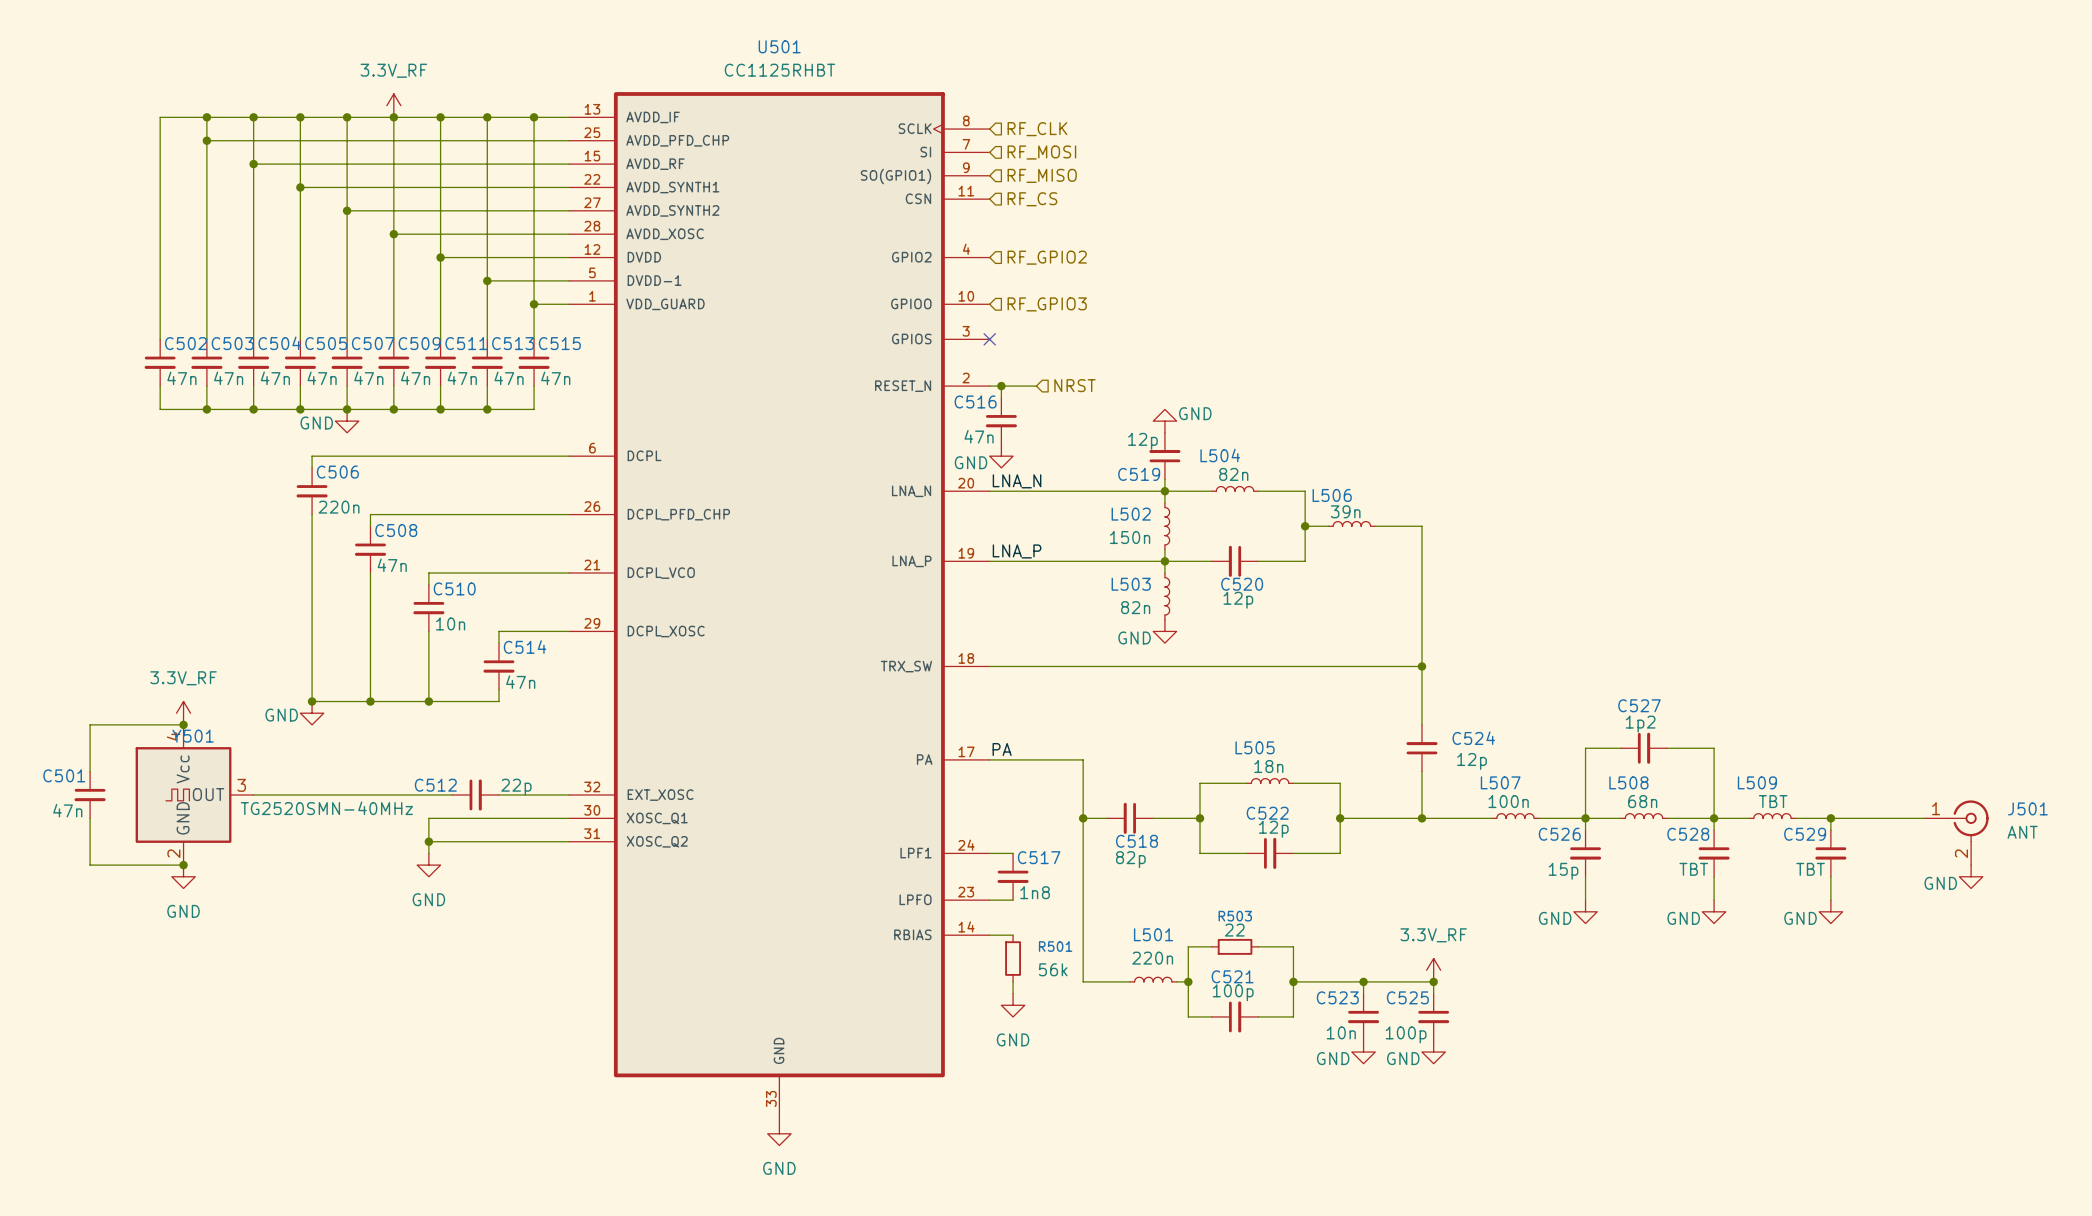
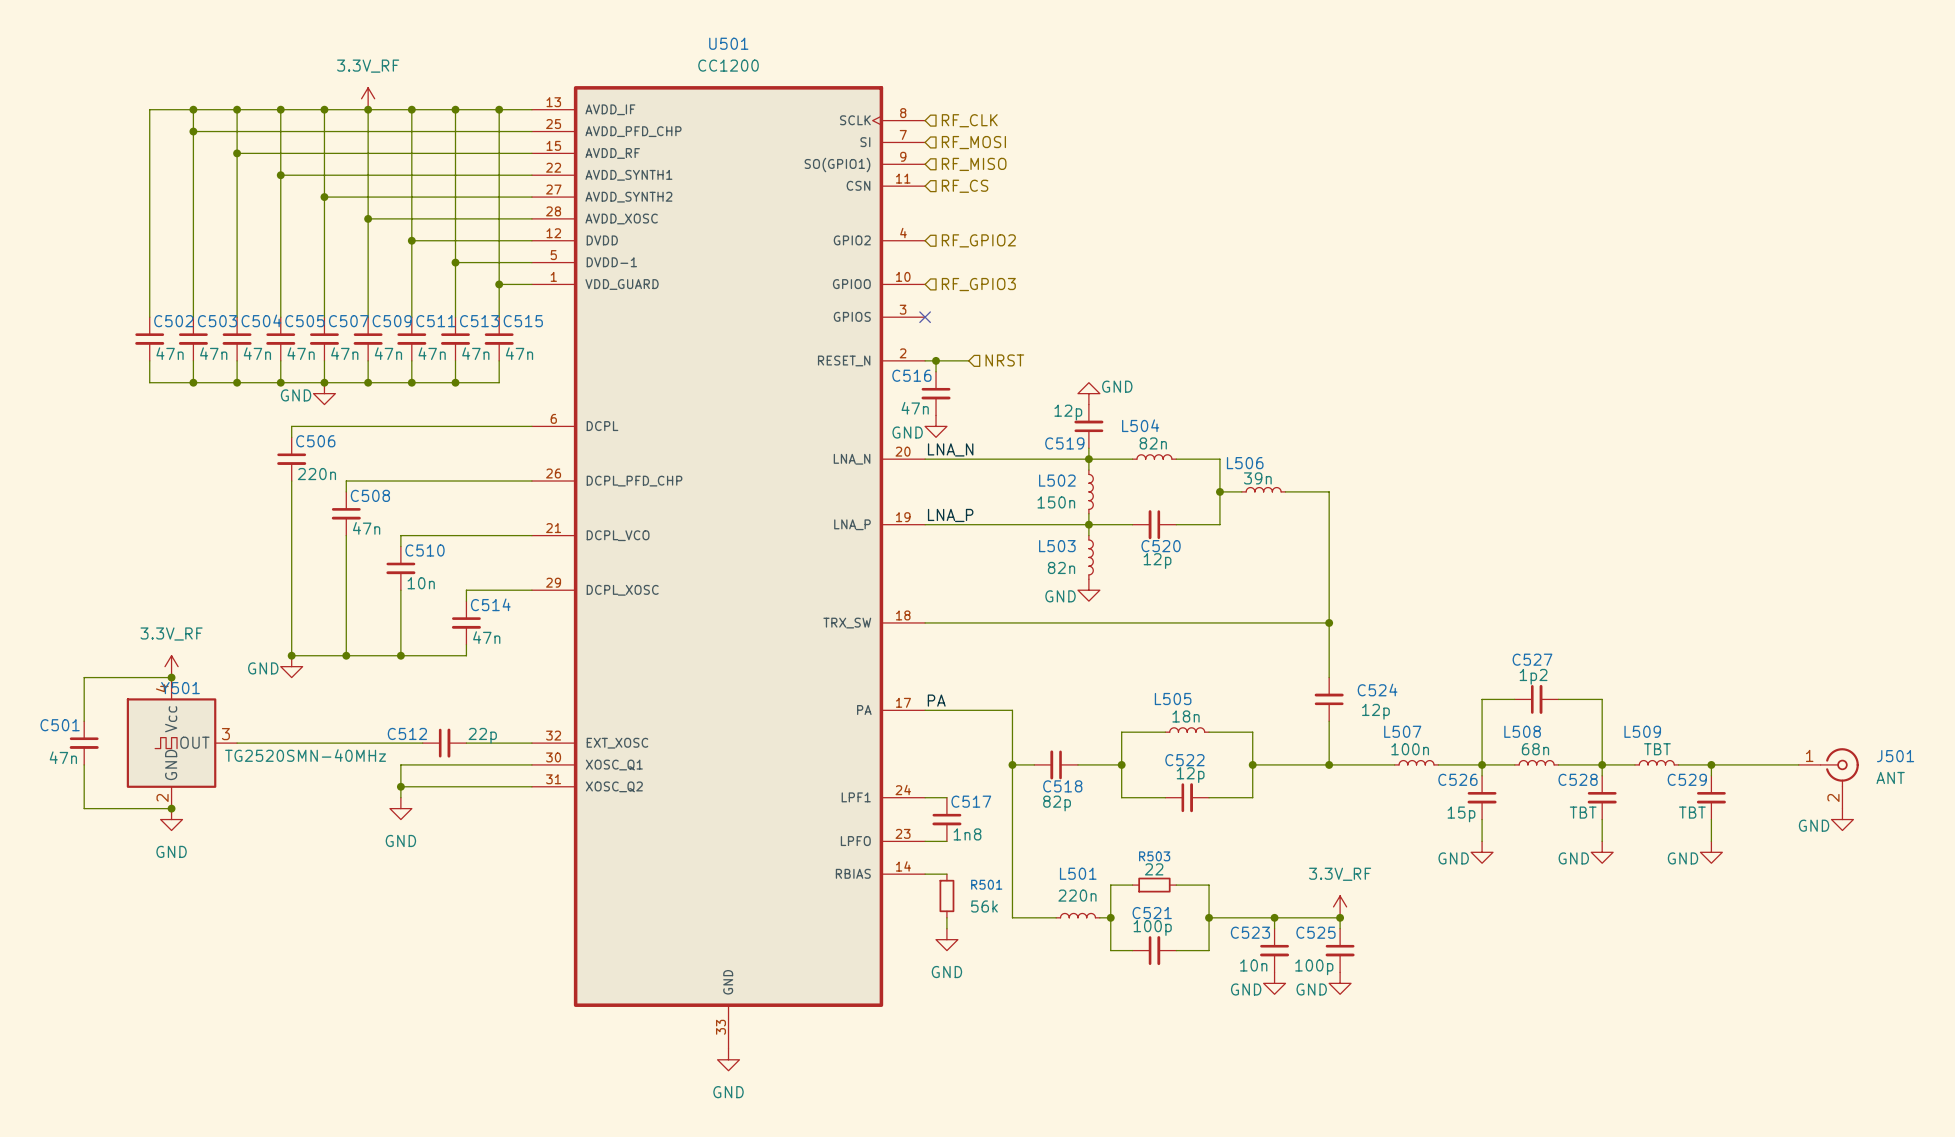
U501 value: CC1125RHBT (779, 70) -> CC1200 (728, 65)

